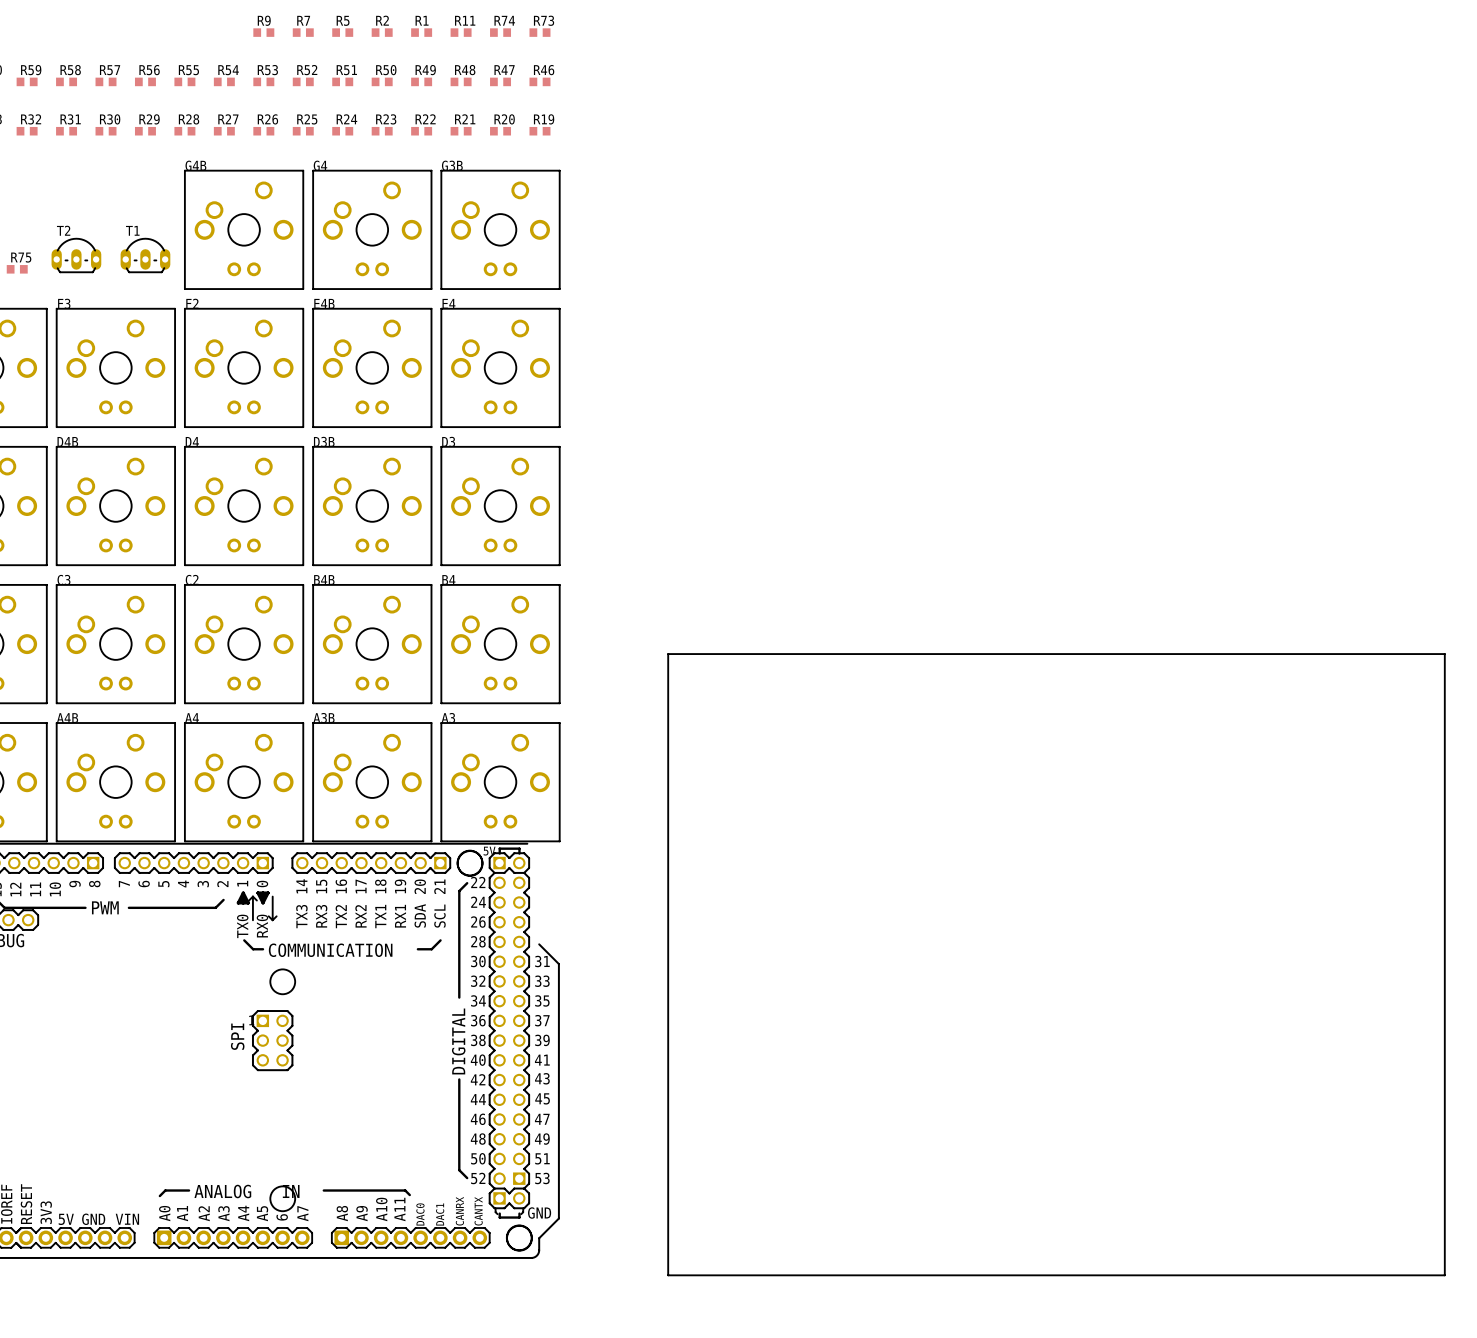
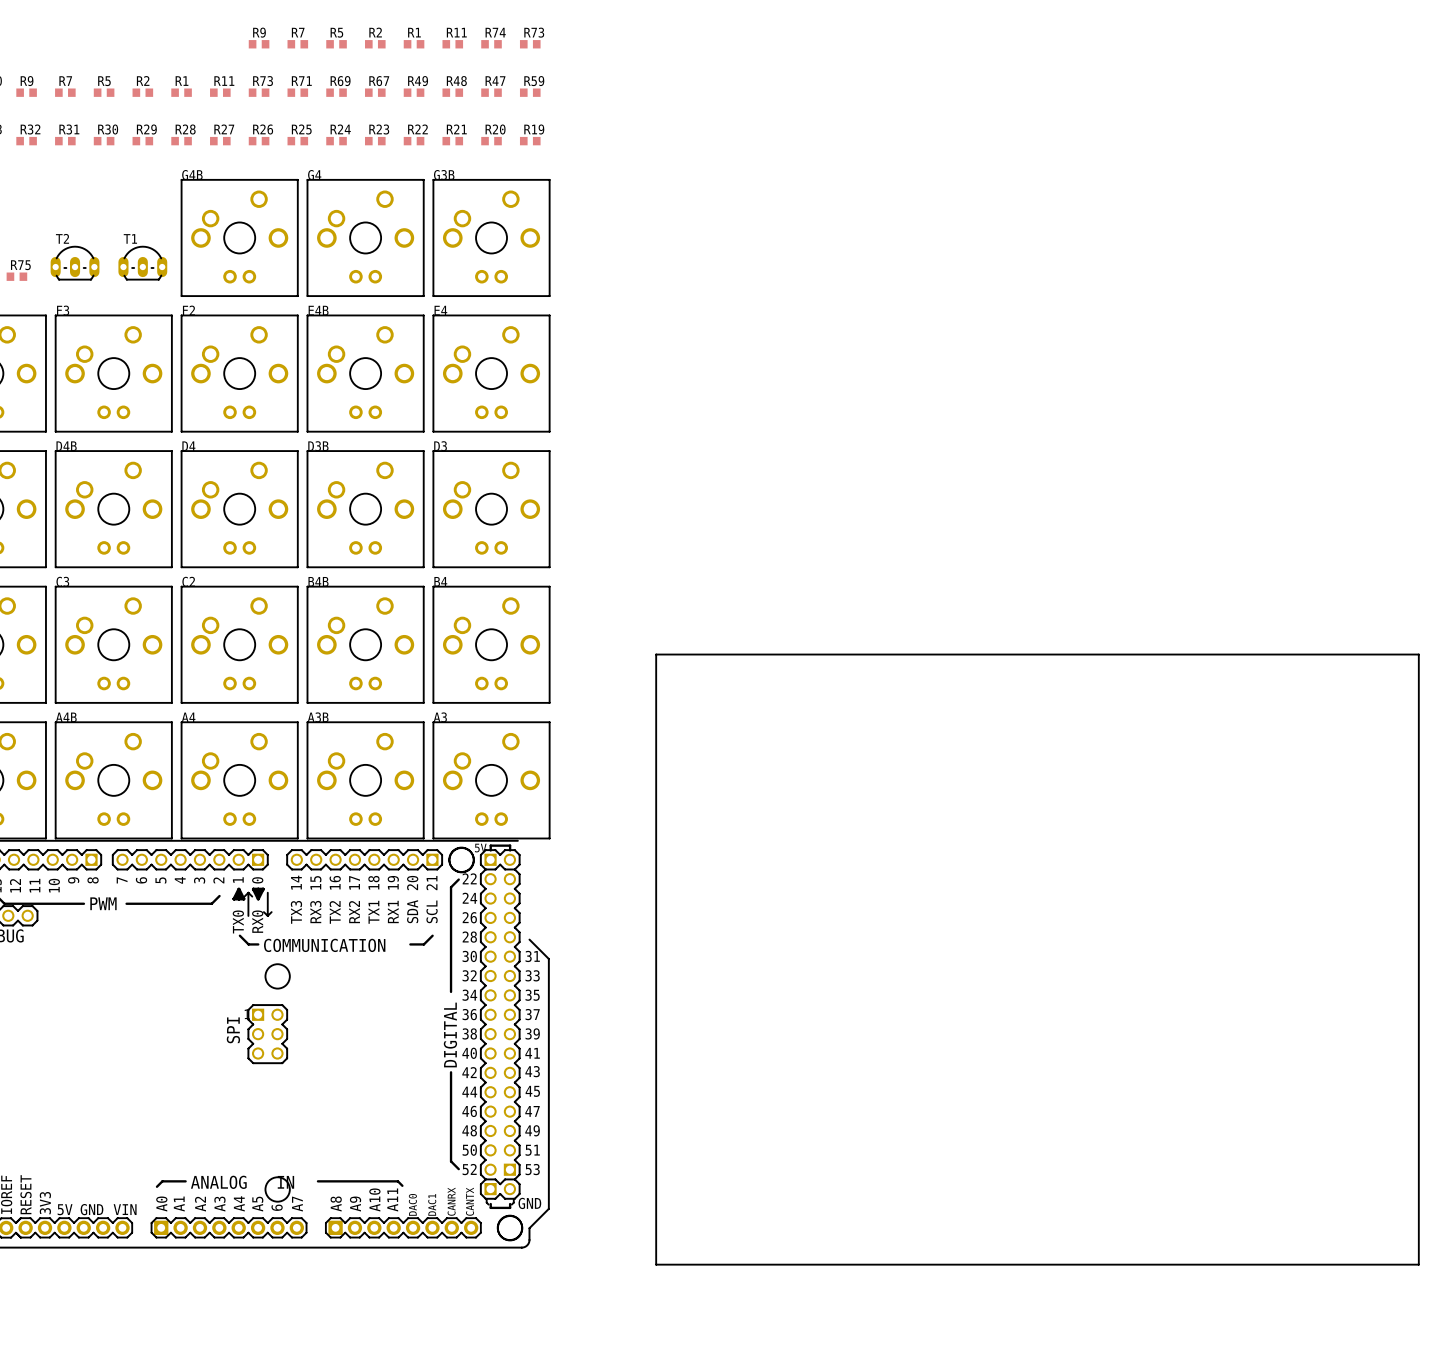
R59 name: R59 (31, 70) -> R9 (27, 81)
R58 name: R58 (70, 70) -> R7 (65, 81)
R57 name: R57 (110, 70) -> R5 (104, 81)
R56 name: R56 (149, 70) -> R2 (143, 80)
R55 name: R55 (188, 70) -> R1 (182, 81)
R54 name: R54 (228, 70) -> R11 (224, 81)
R53 name: R53 (267, 70) -> R73 (263, 81)
R52 name: R52 (307, 70) -> R71 (301, 81)
R51 name: R51 (346, 70) -> R69 (340, 81)
R50 name: R50 (386, 70) -> R67 (379, 81)
R46 name: R46 (544, 70) -> R59 (534, 81)

